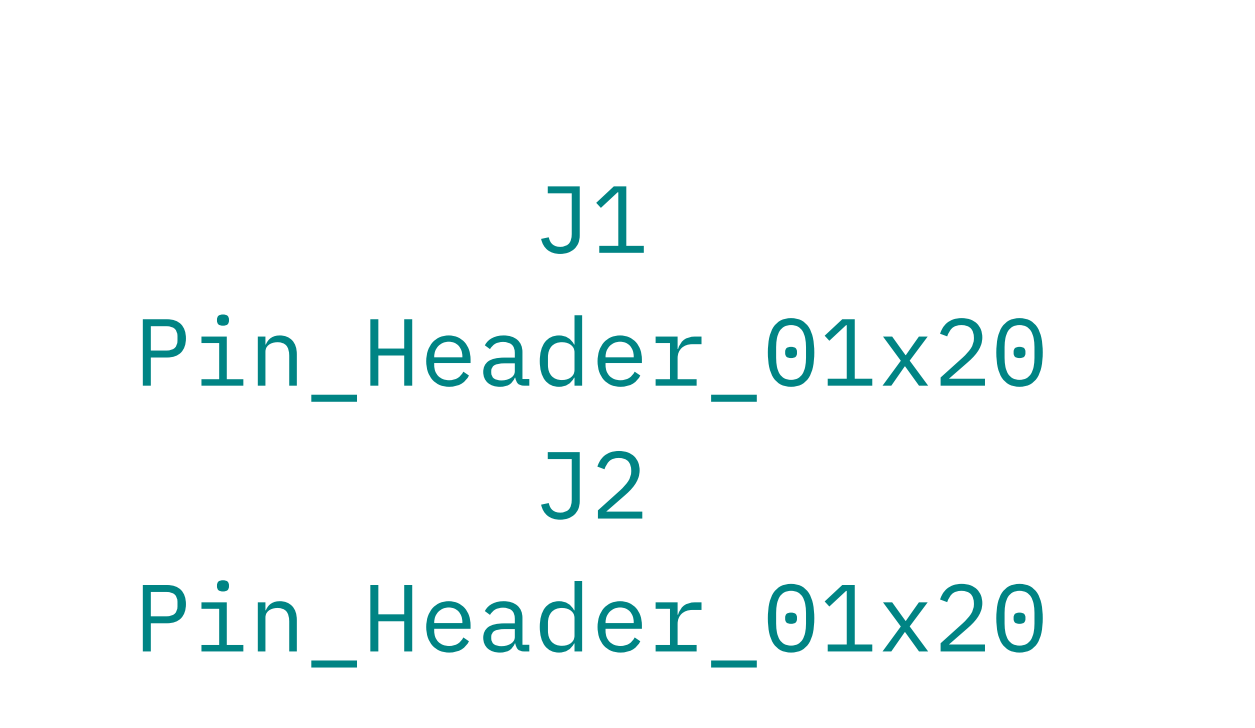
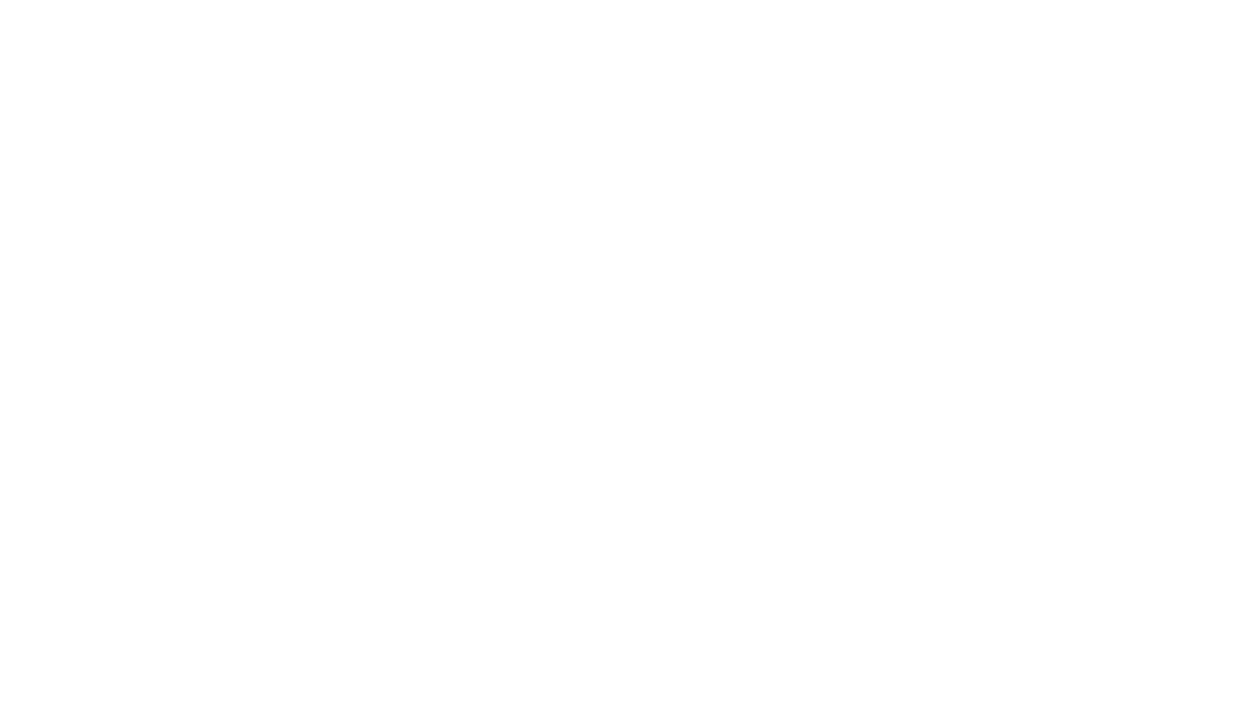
J1: Pin_Header_01x20 (592, 294) -> none
J2: Pin_Header_01x20 (592, 559) -> none

